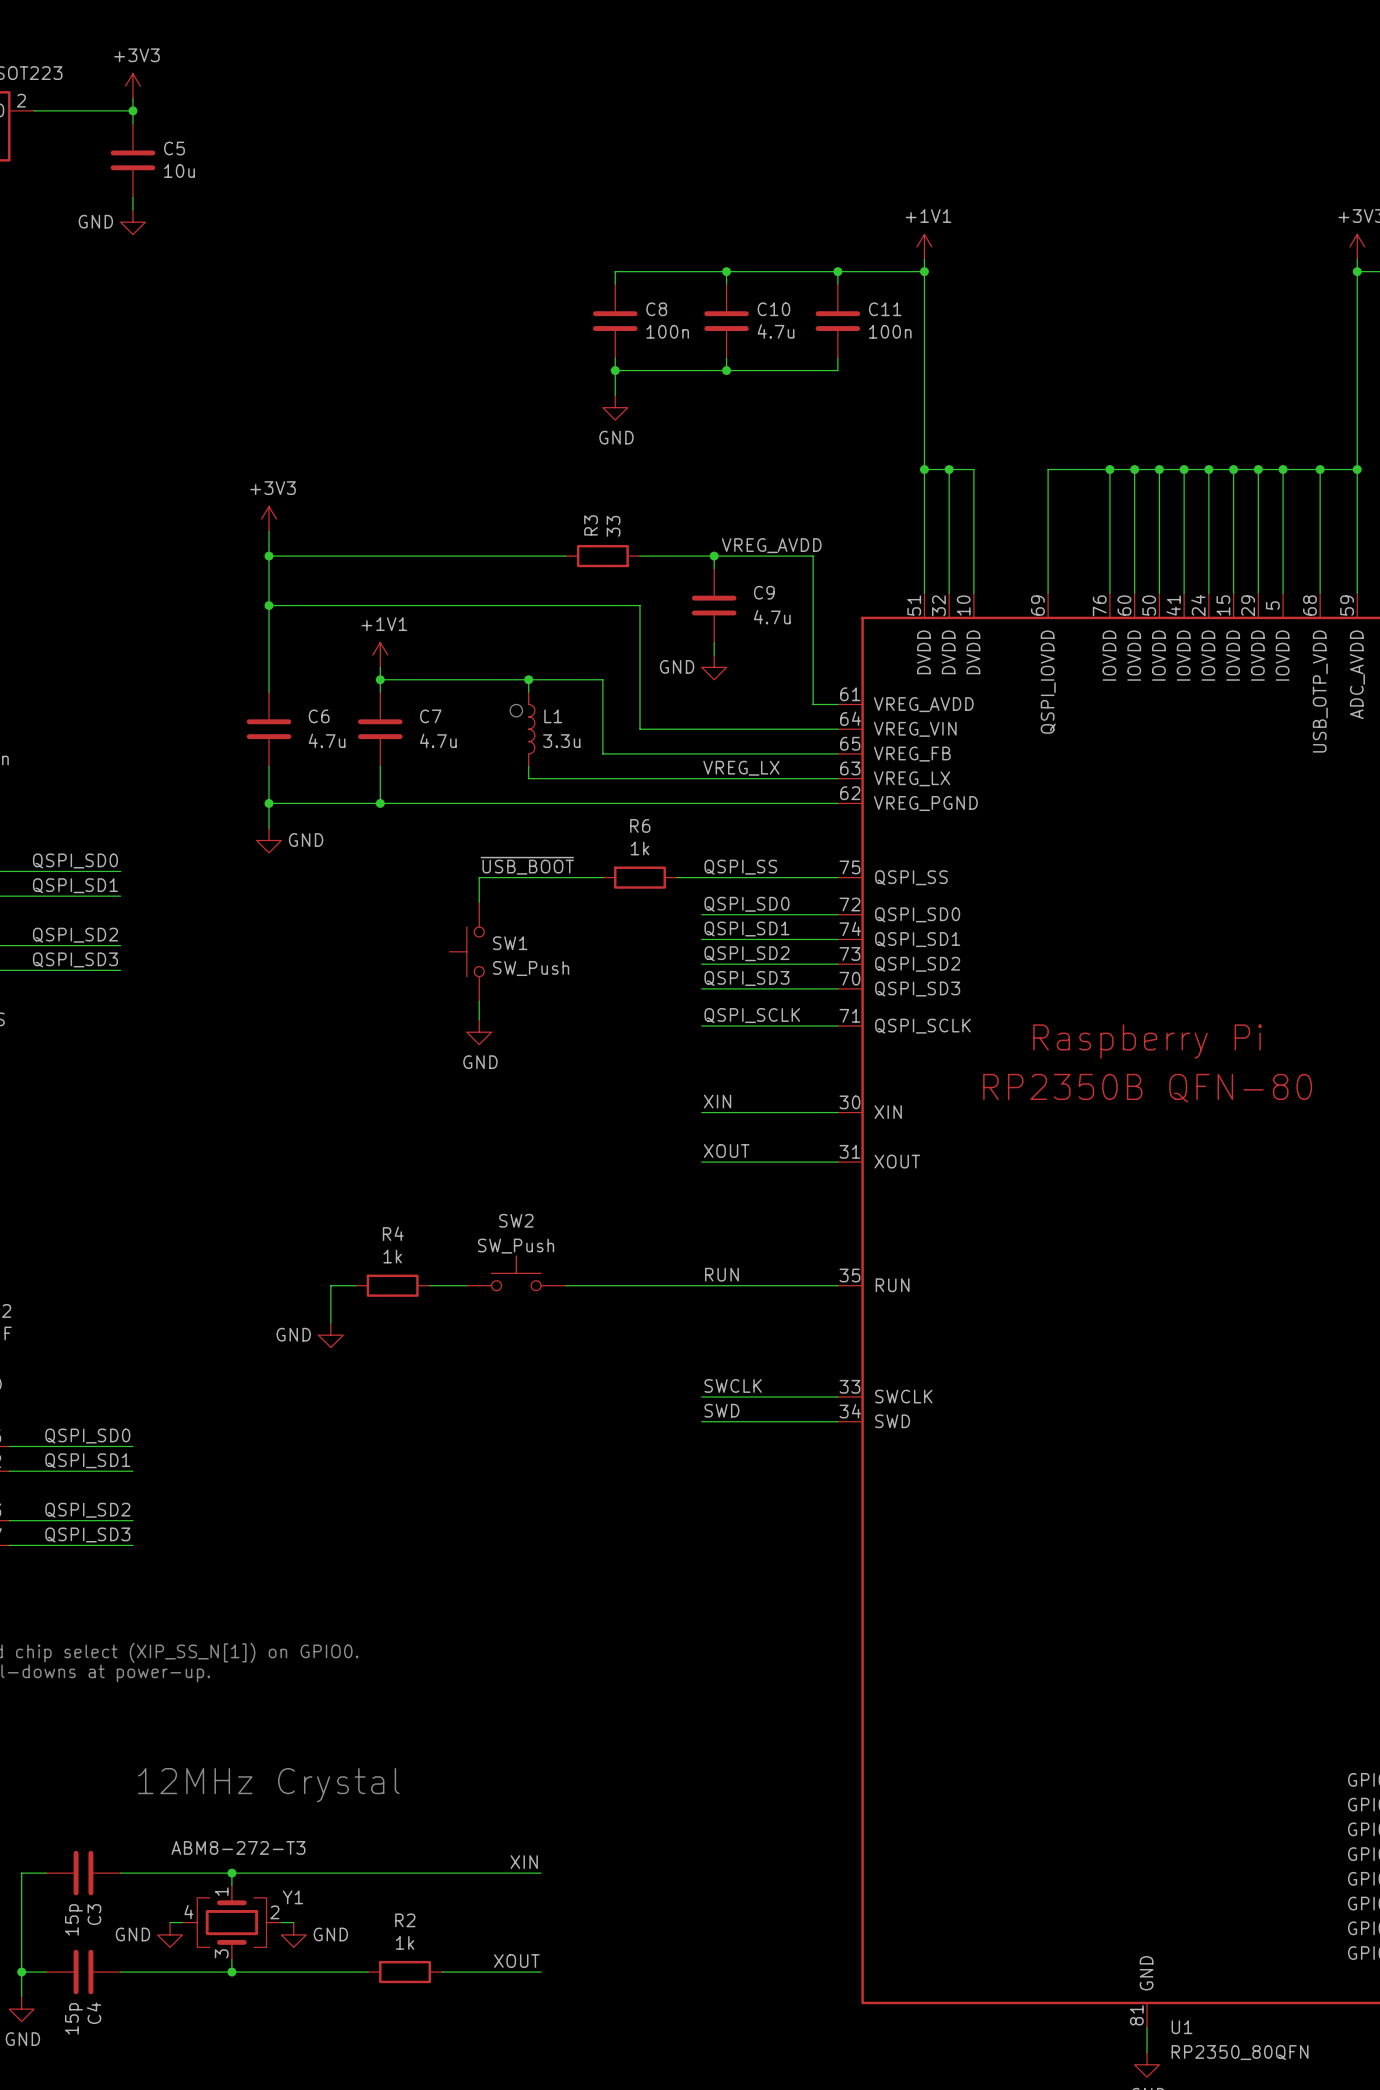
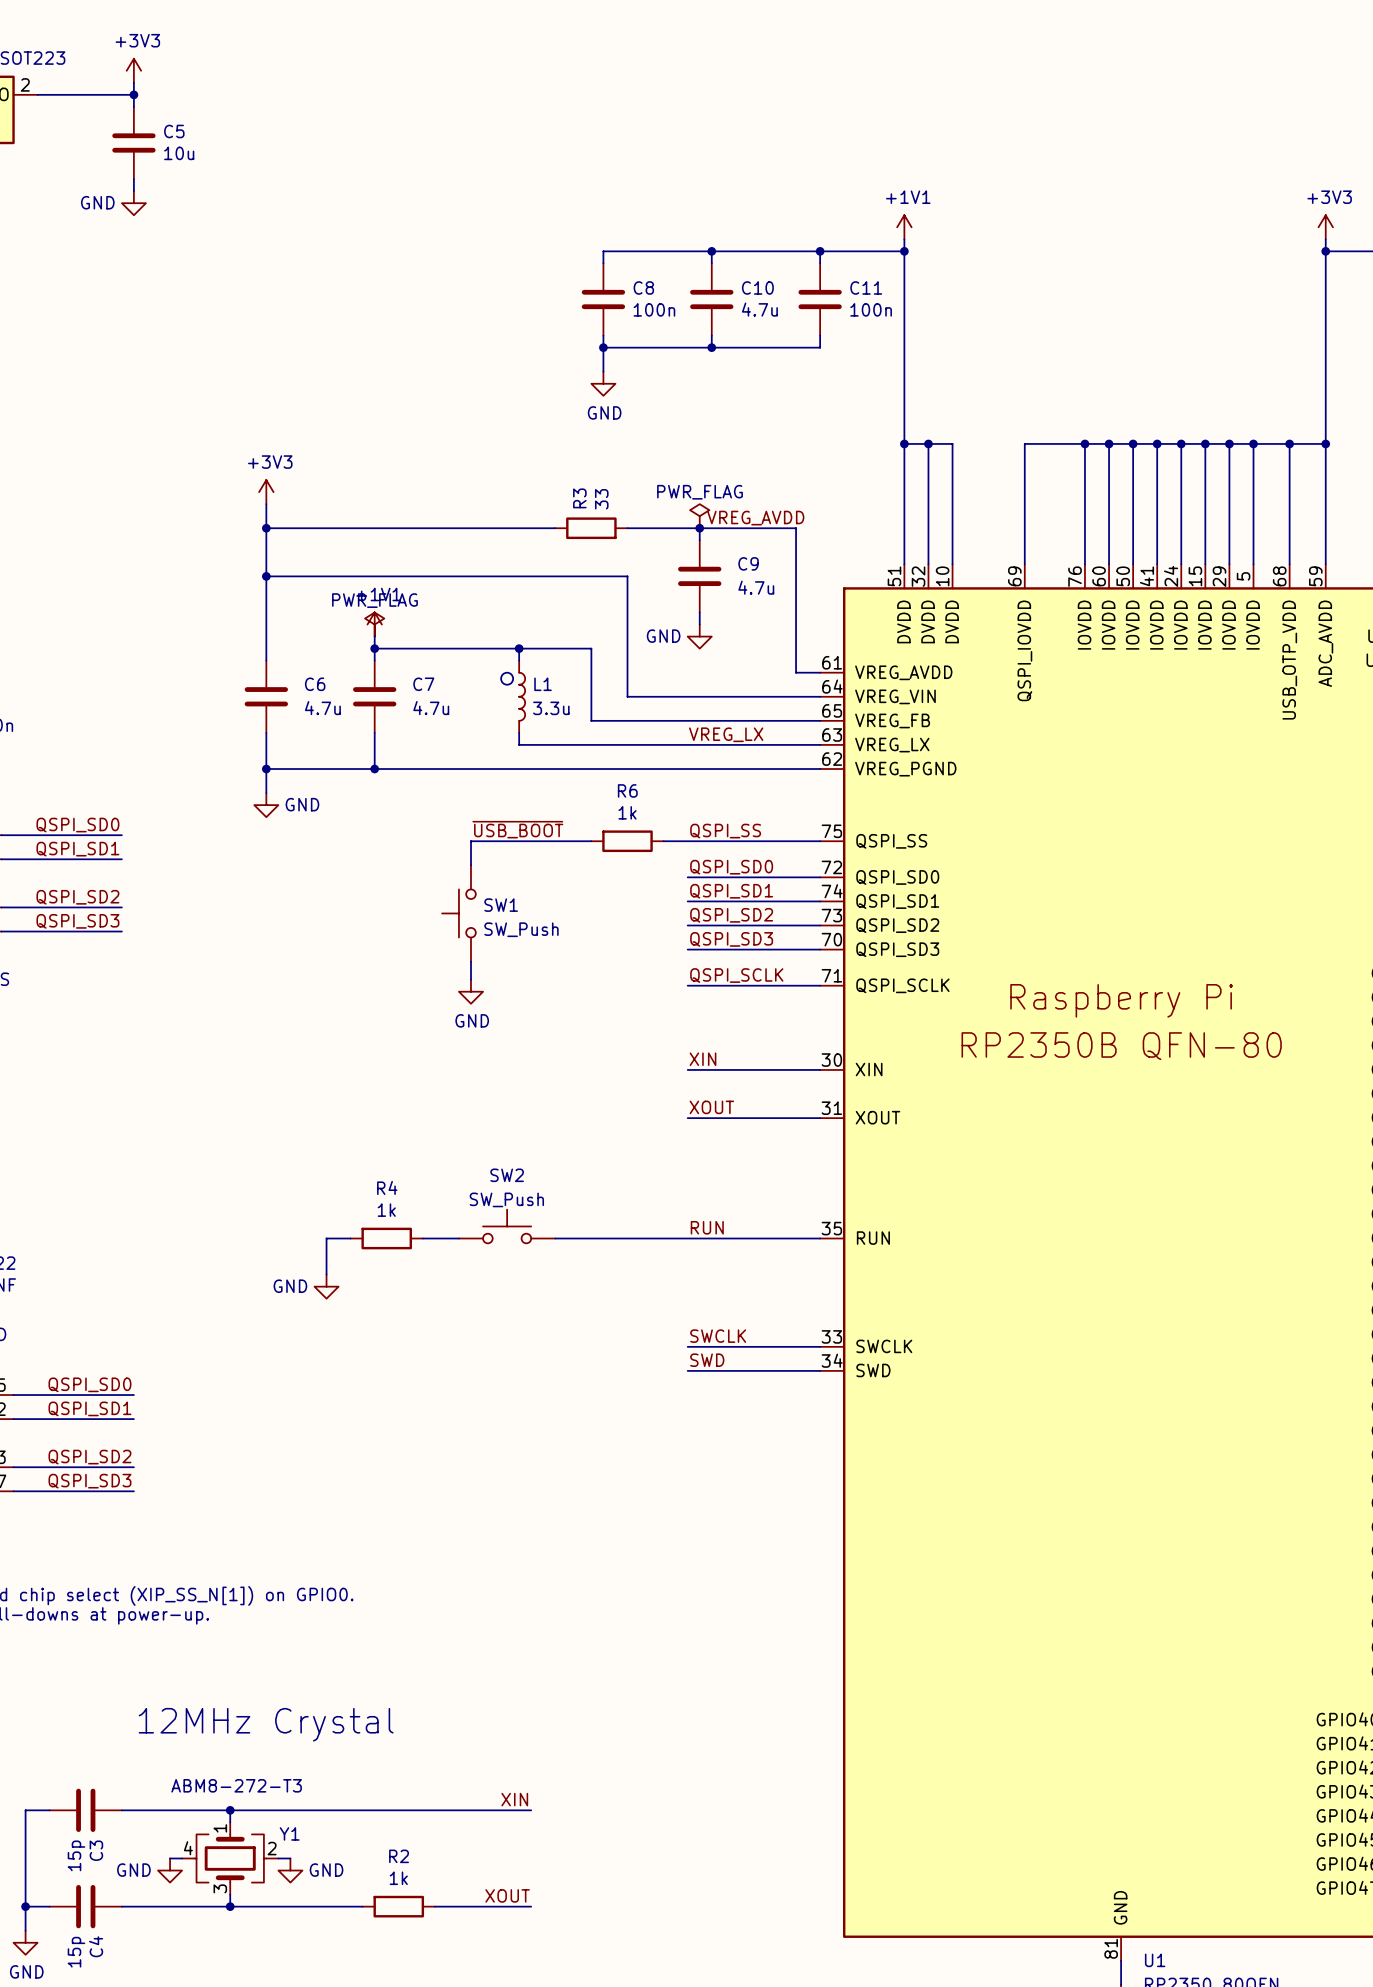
power symbol: none -> PWR_FLAG (699, 516)
power symbol: none -> PWR_FLAG (374, 624)

